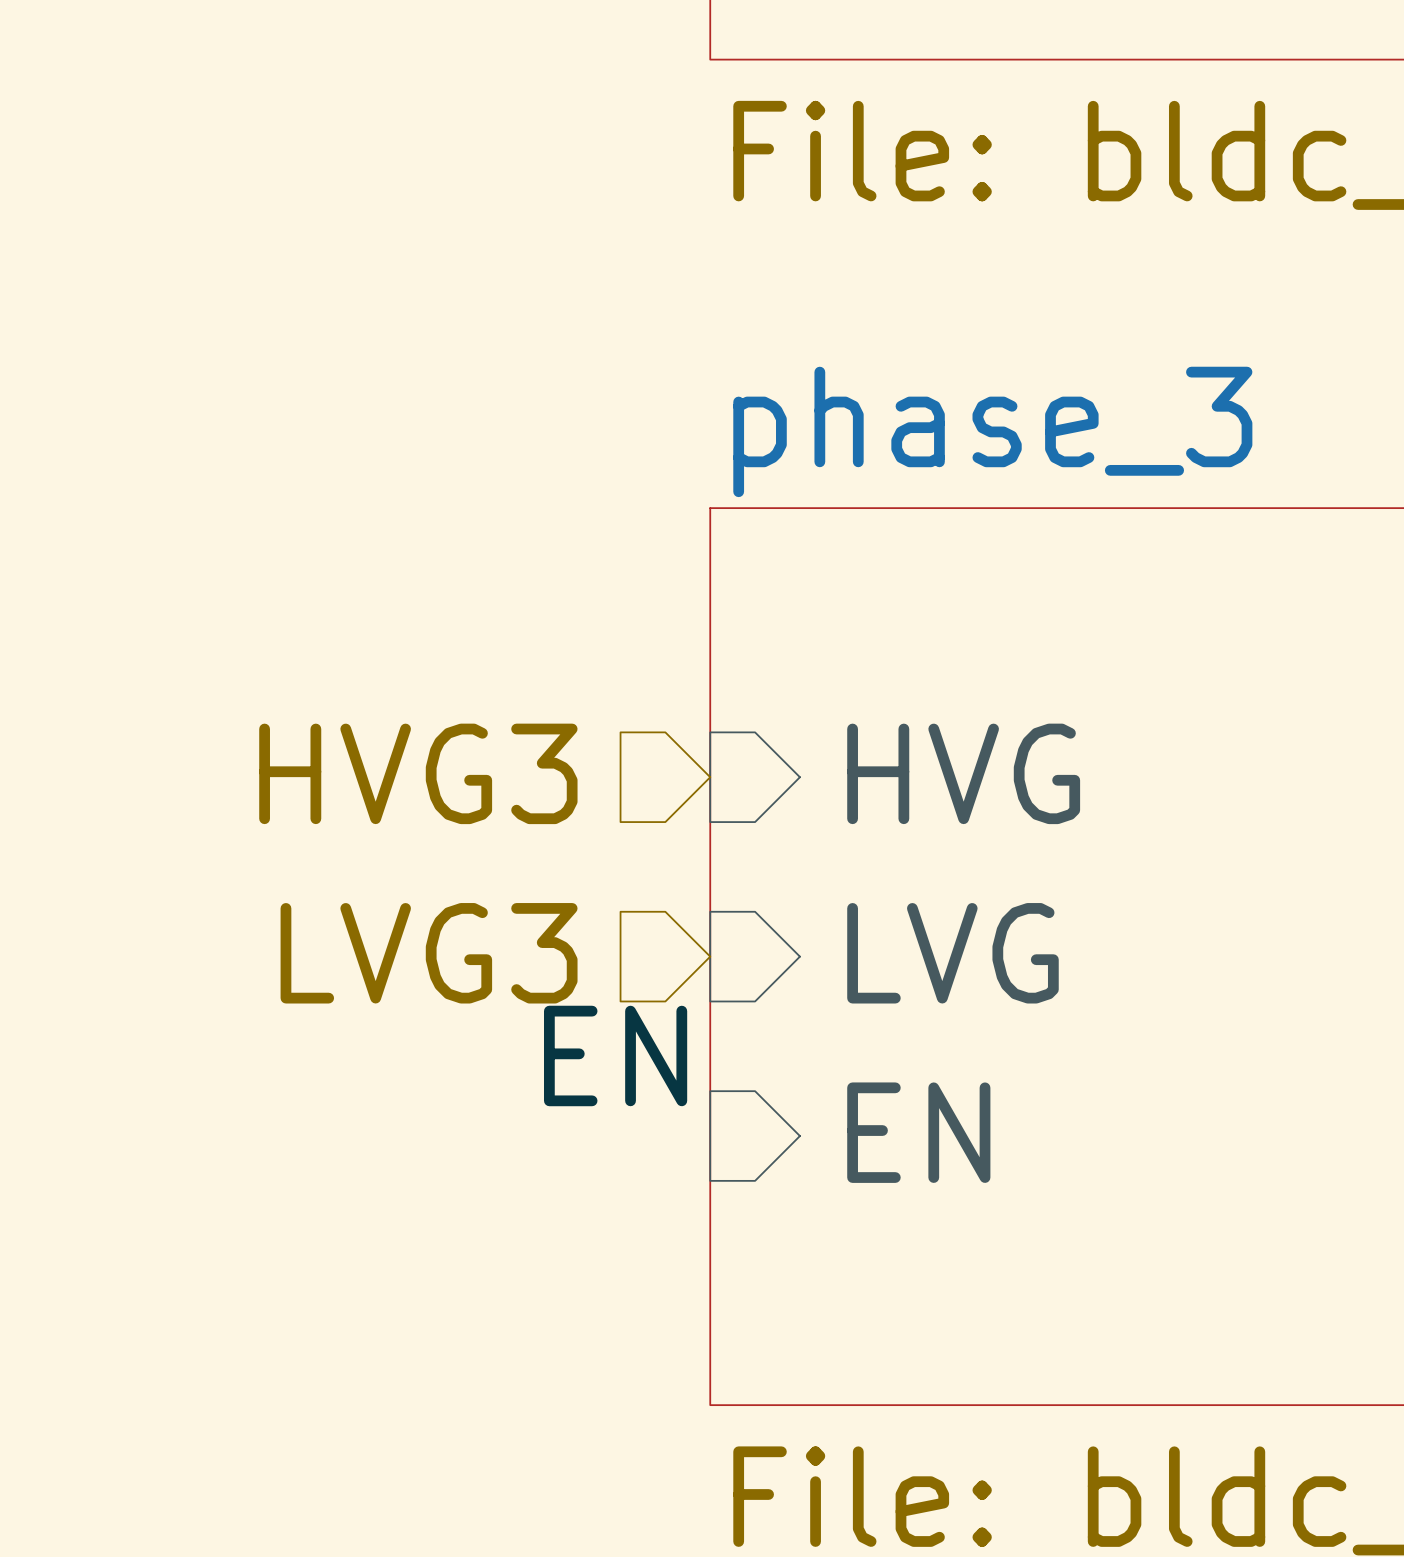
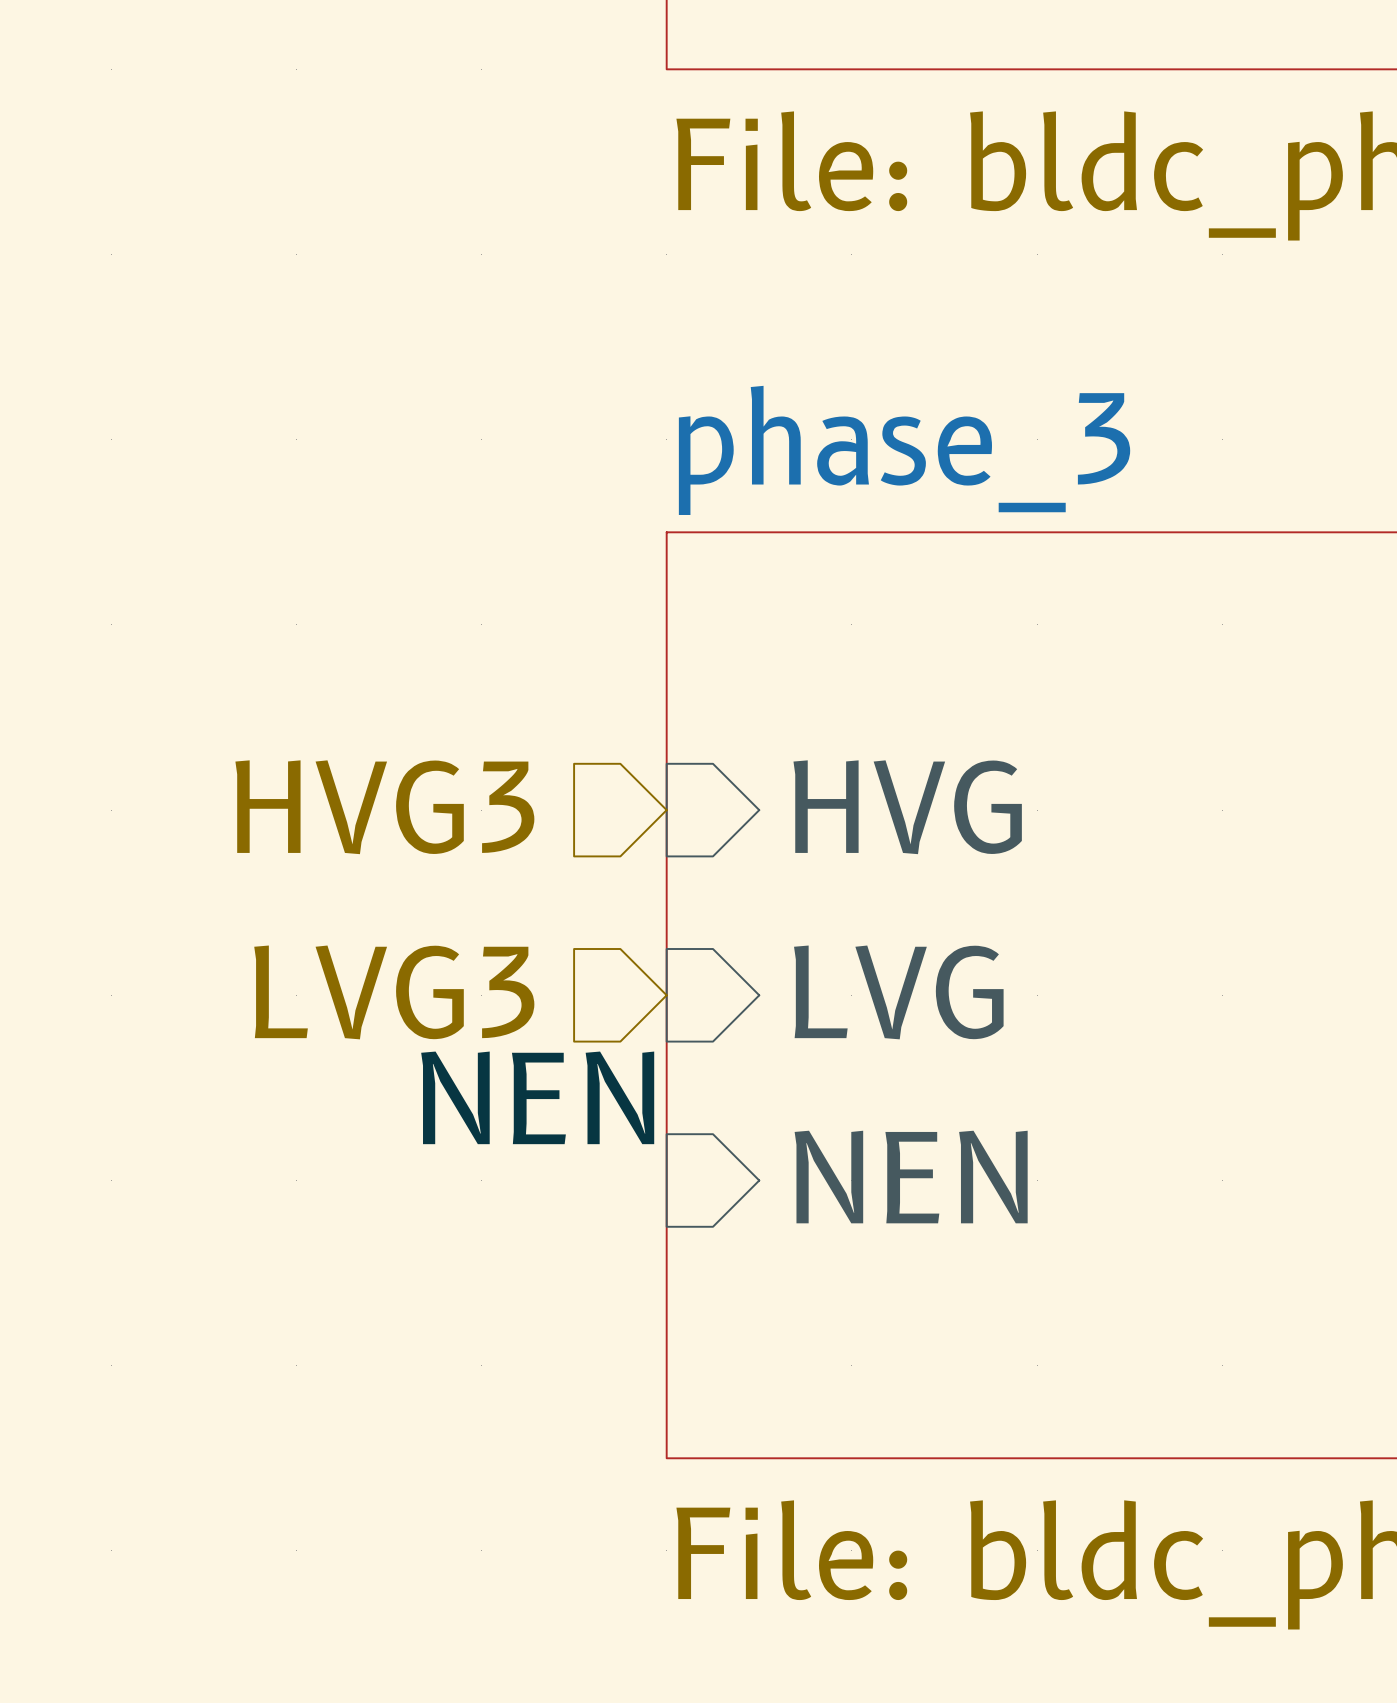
label: EN (615, 1055) -> NEN (537, 1097)
sheet pin: EN (918, 1132) -> NEN (911, 1177)

